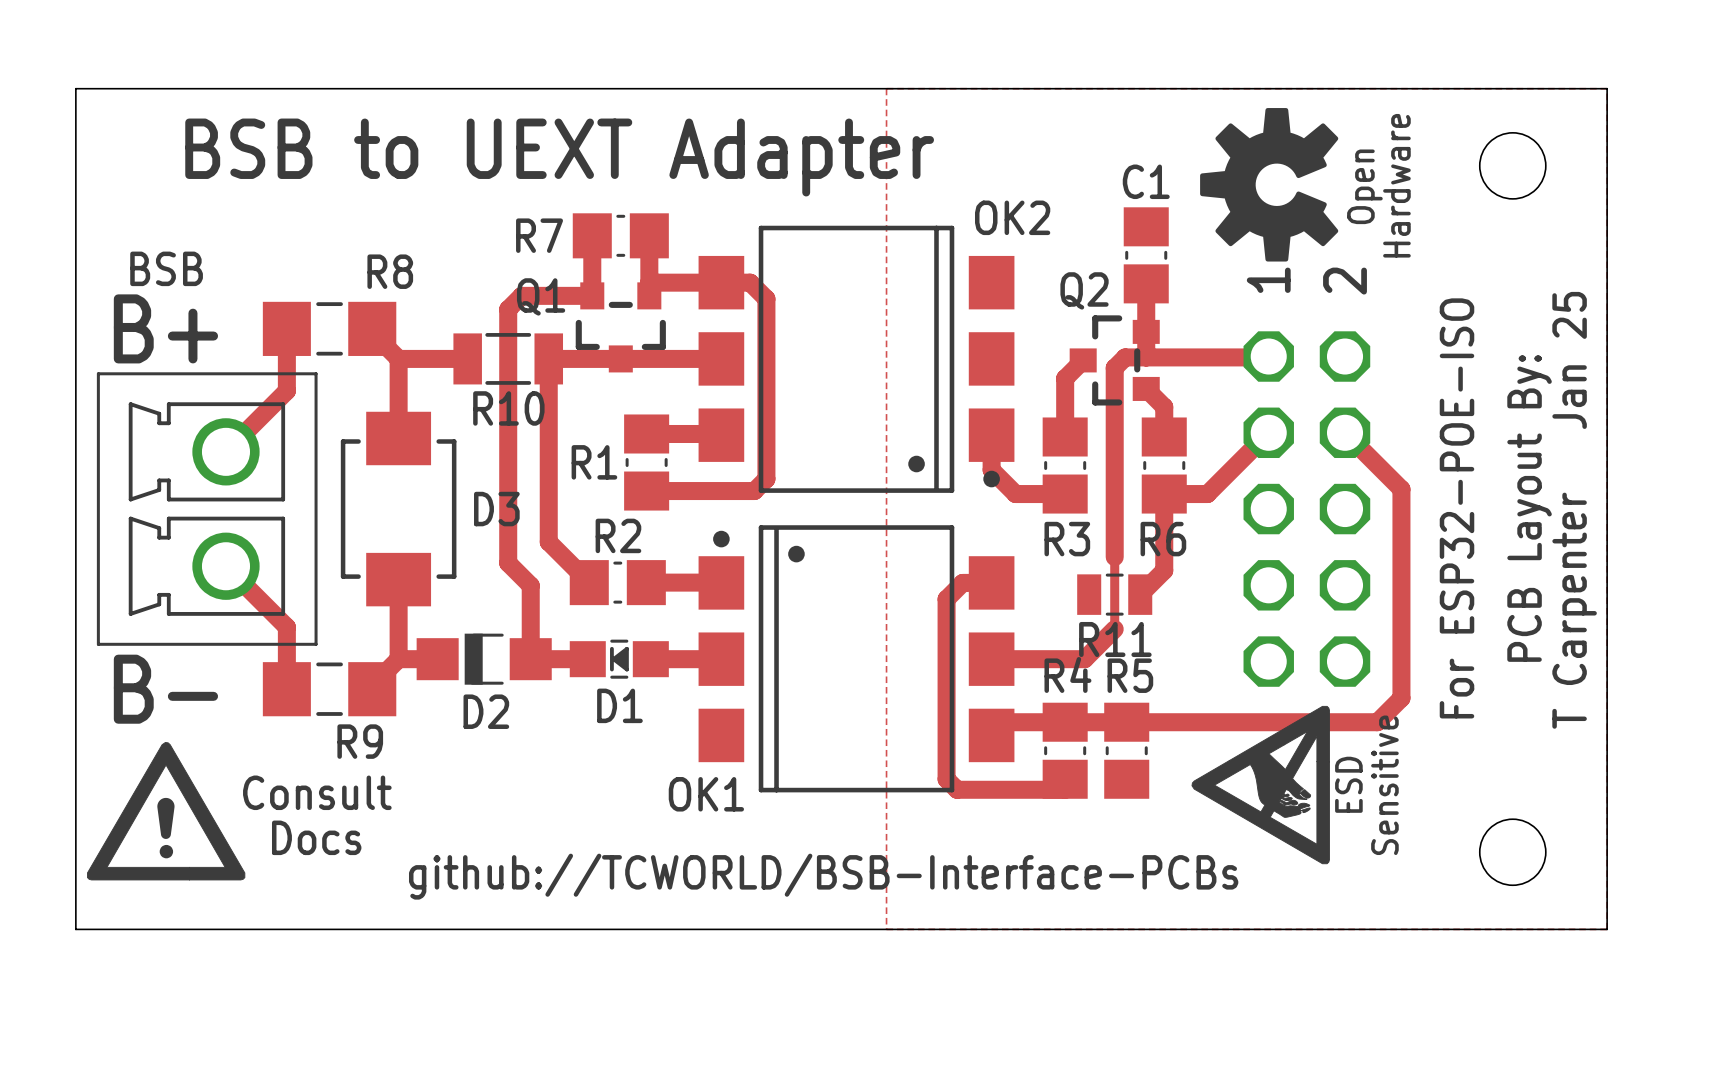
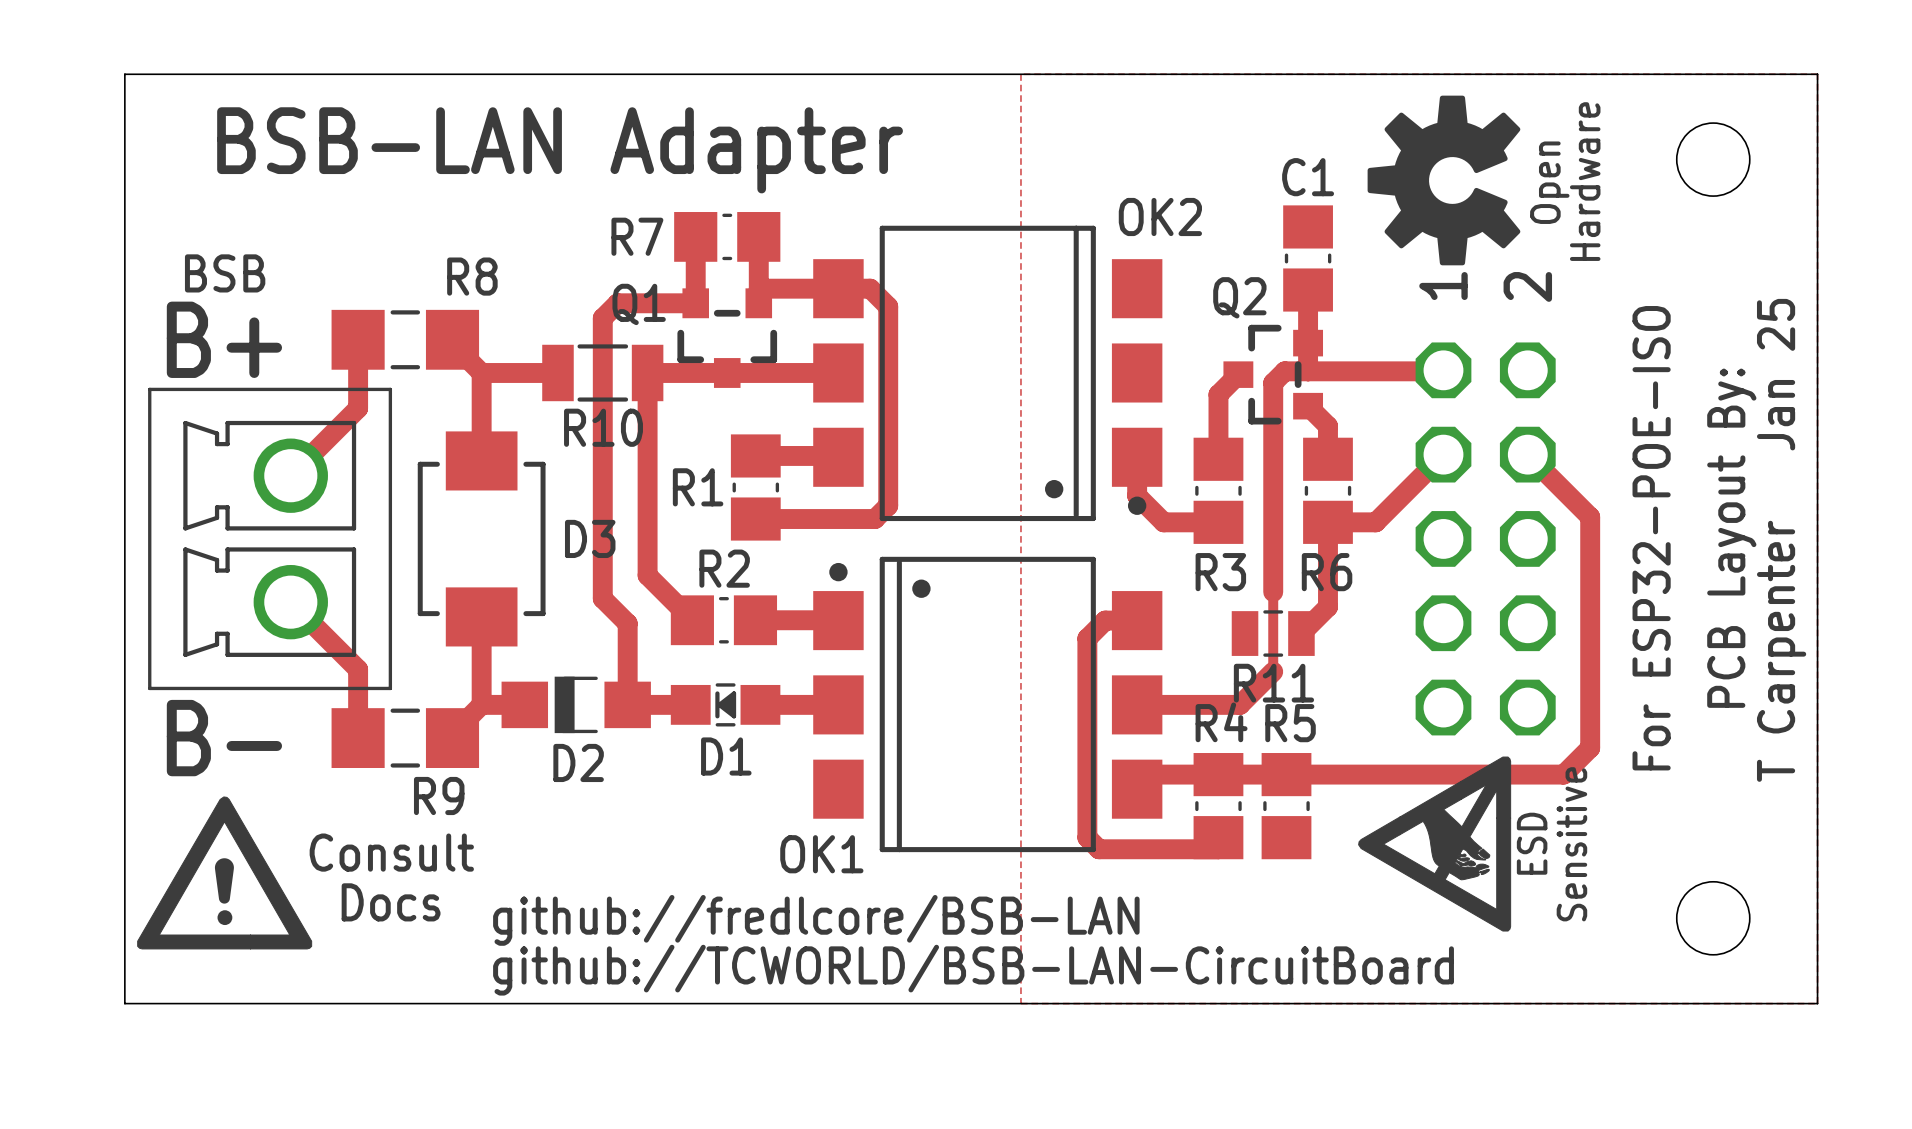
text: BSB to UEXT Adapter (559, 157) -> BSB-LAN Adapter (560, 150)
text: none -> github://fredlcore/BSB-LAN (816, 920)
text: github://TCWORLD/BSB-Interface-PCBs (823, 876) -> github://TCWORLD/BSB-LAN-CircuitBoard (973, 970)

